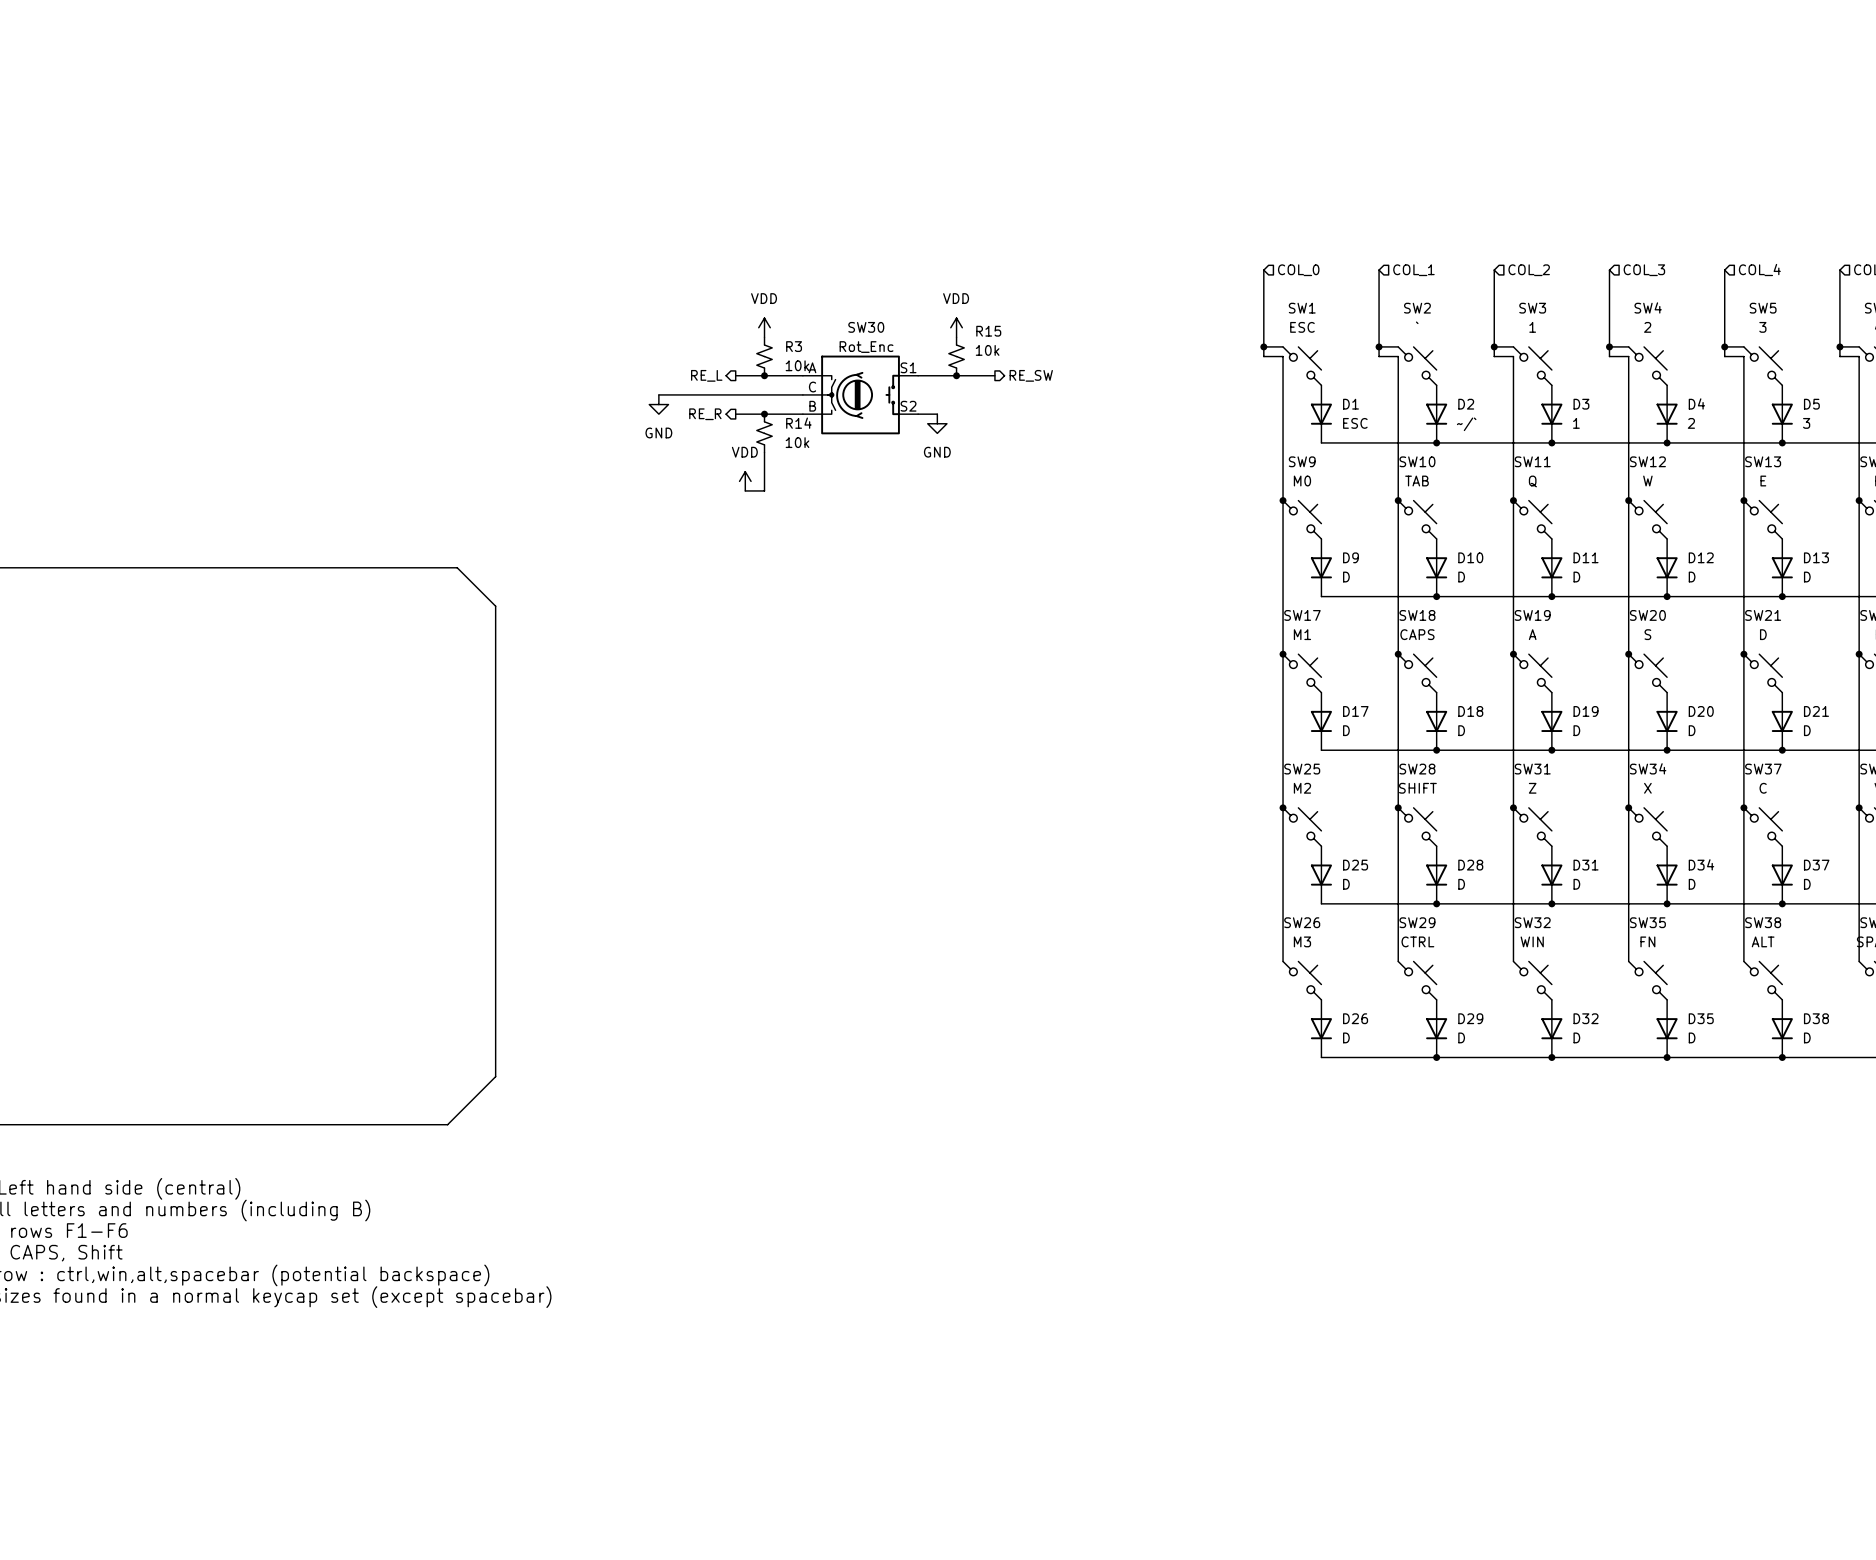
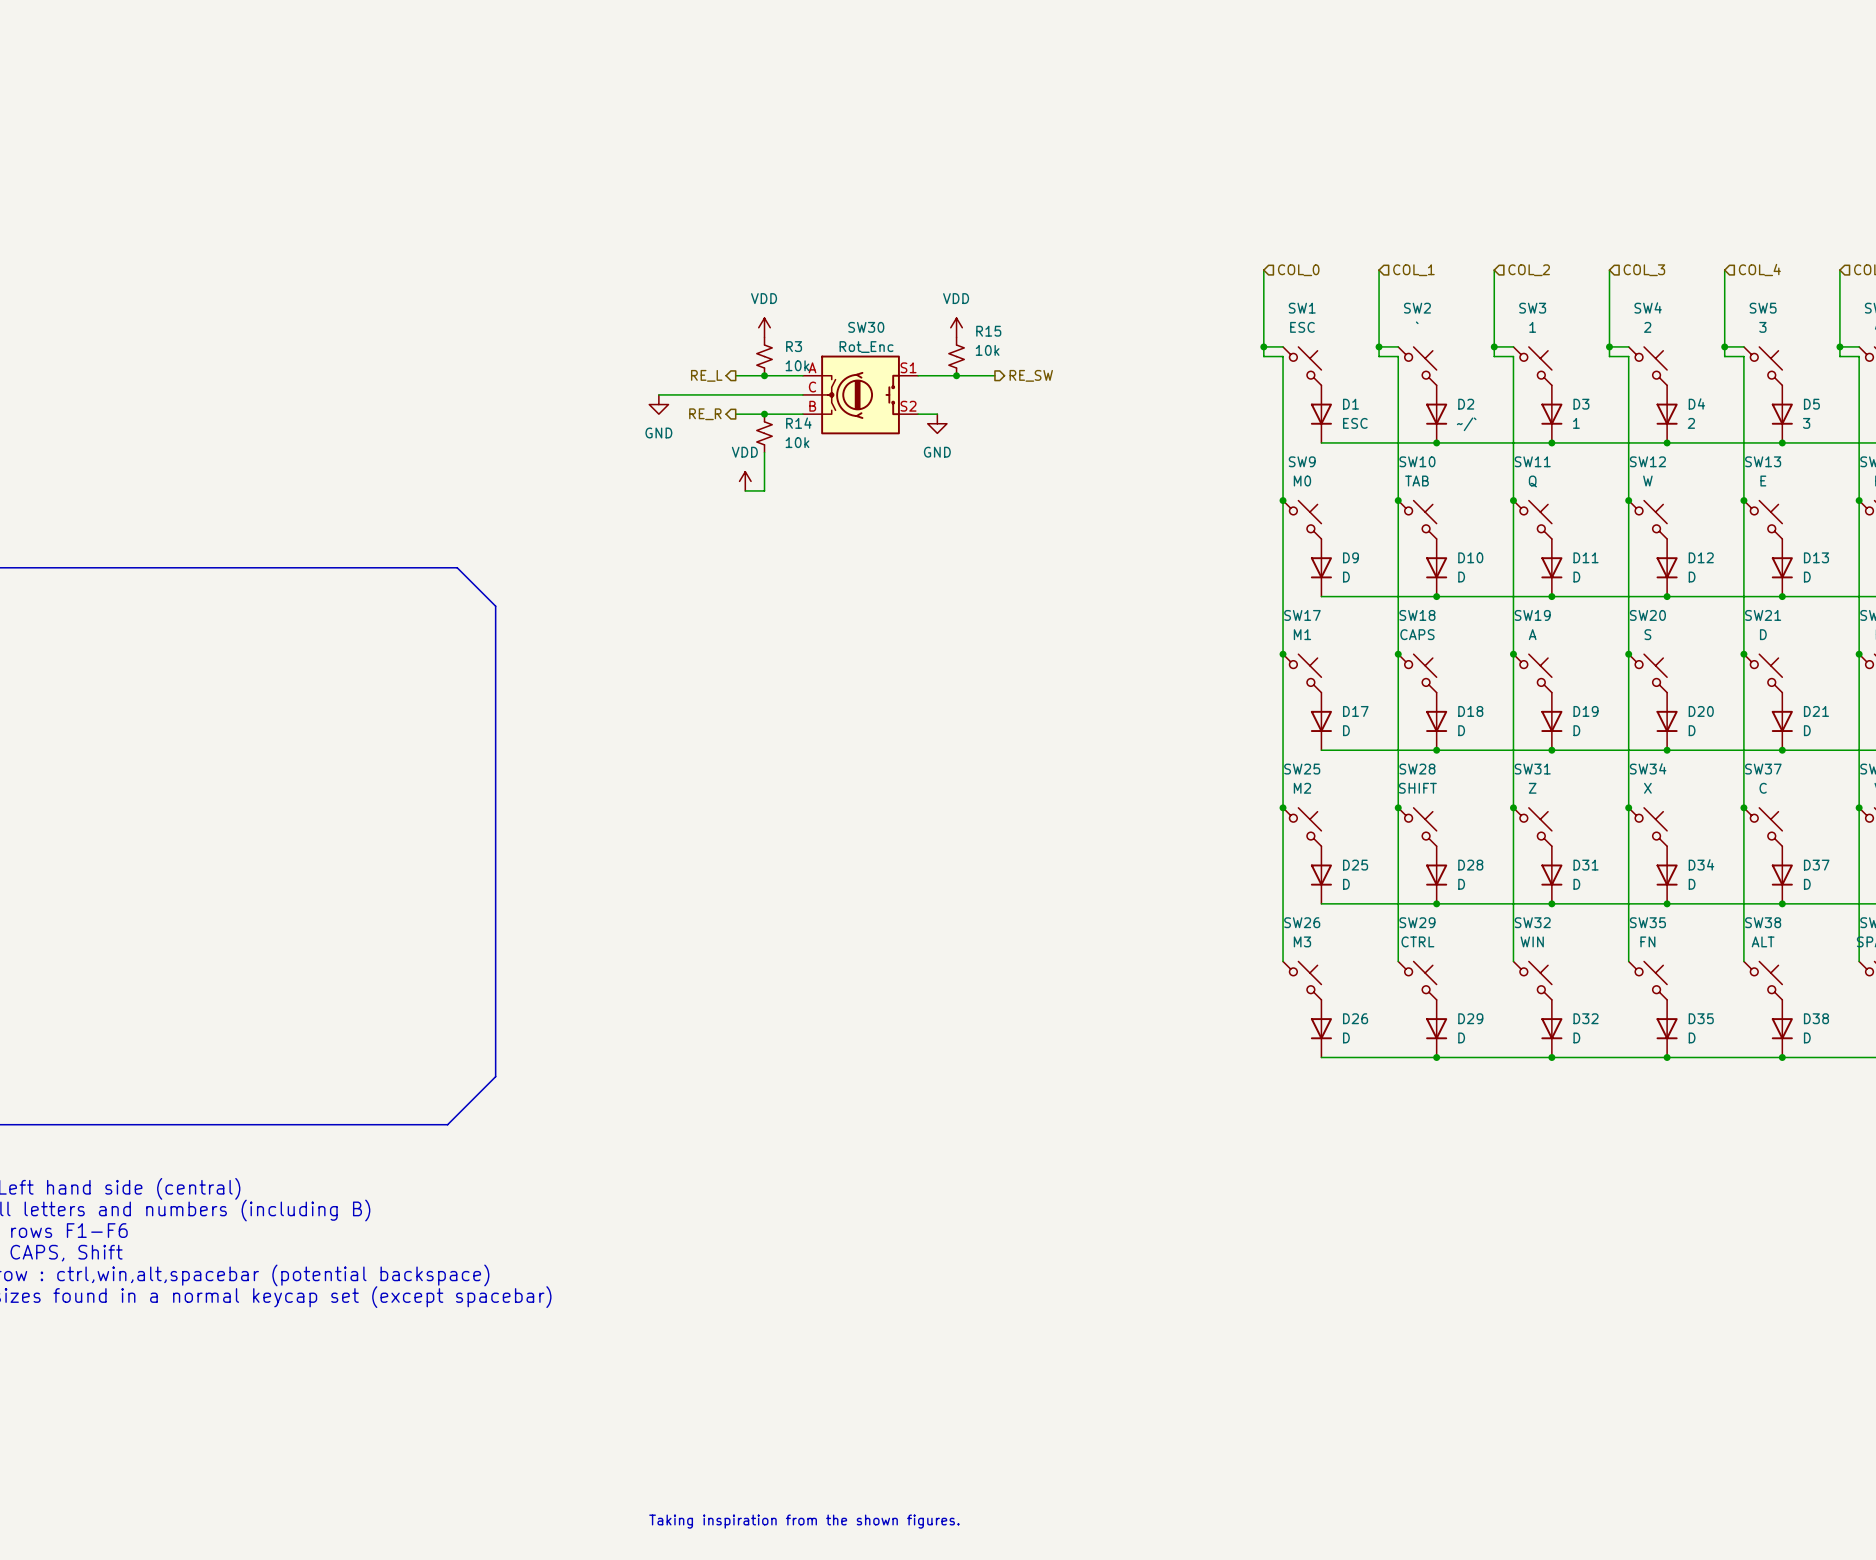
text: none -> Taking inspiration from the shown figures. (804, 1521)

